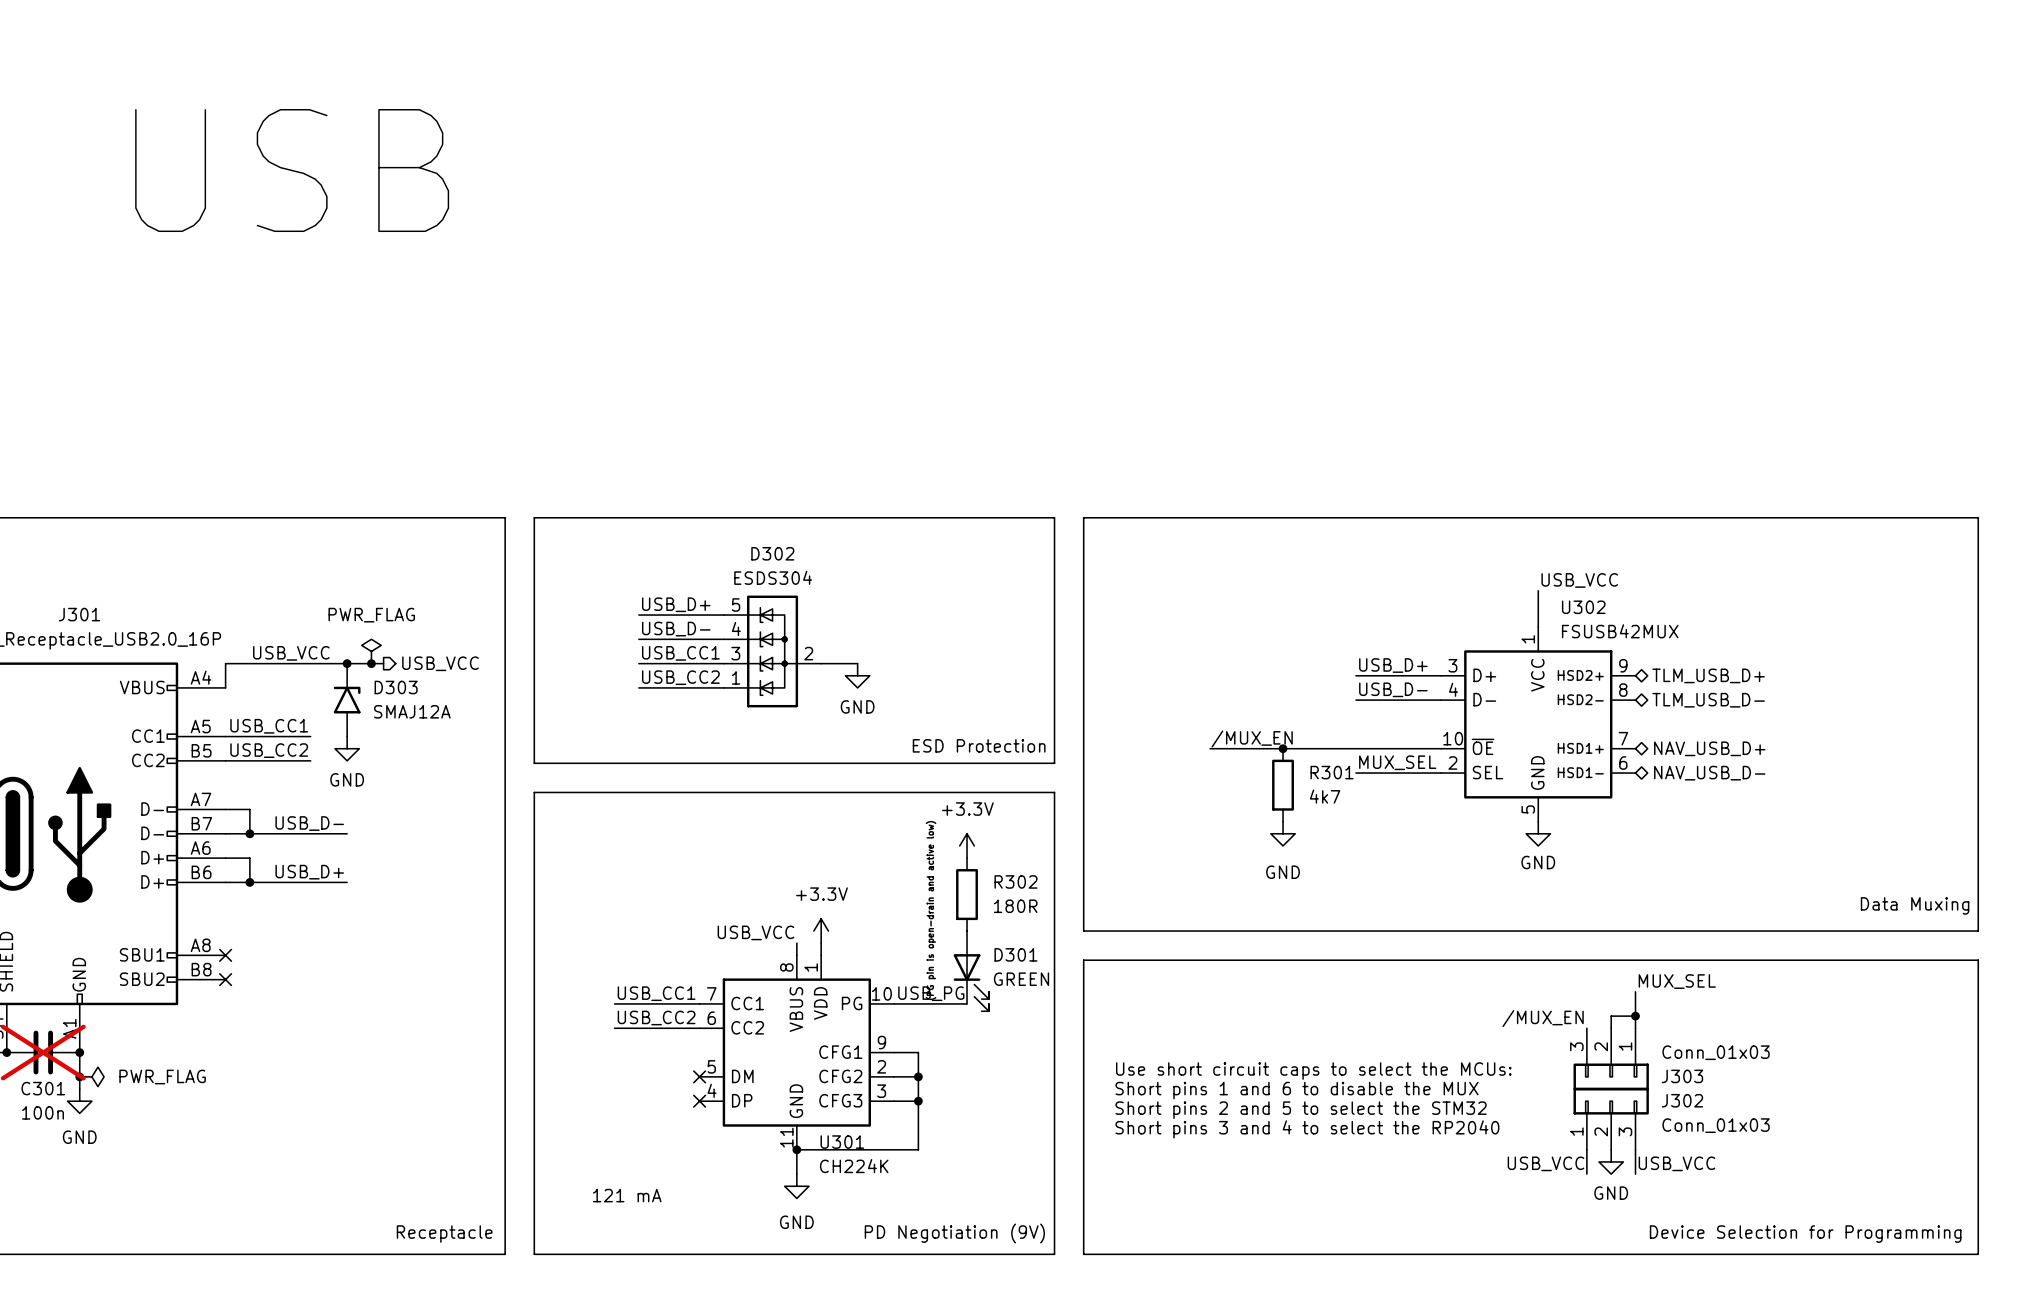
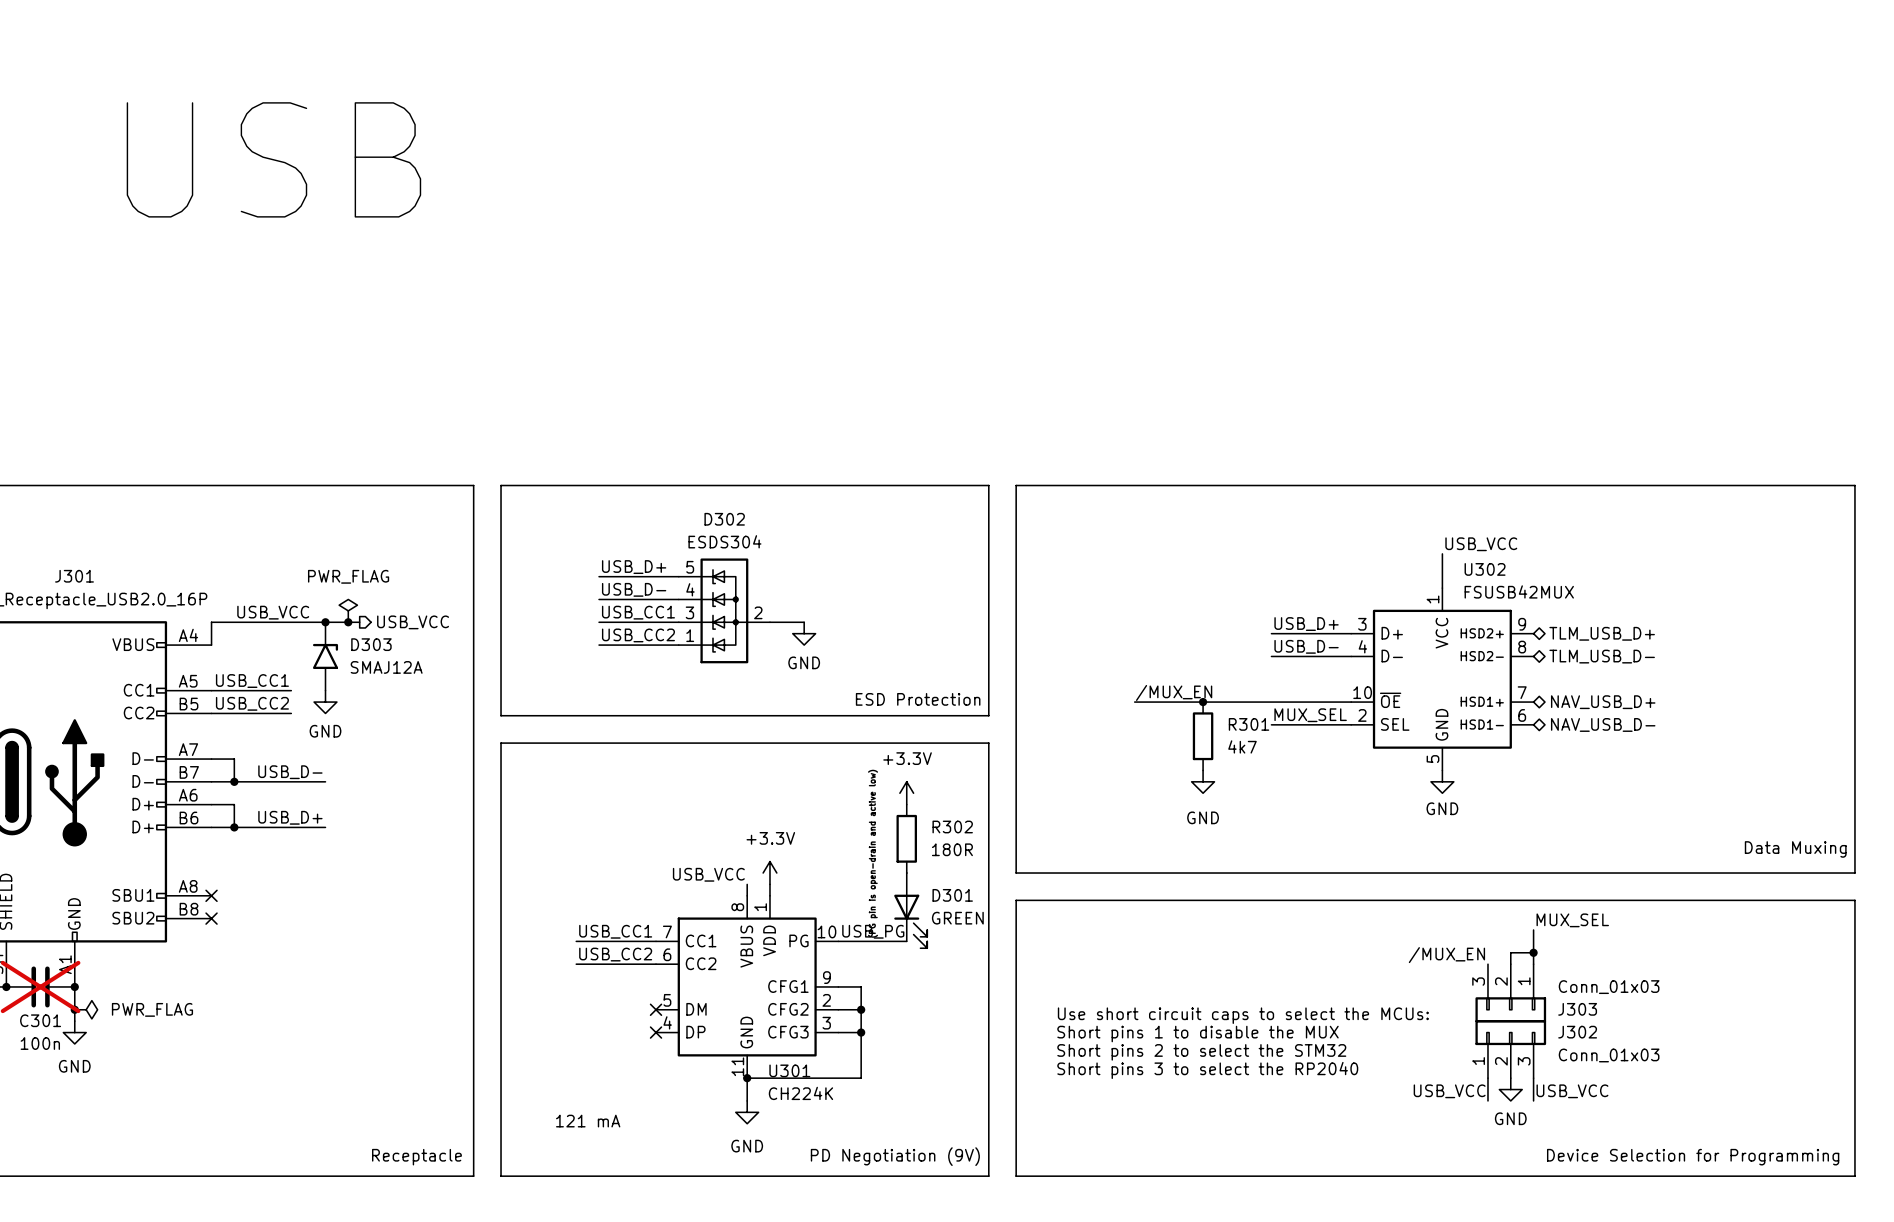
text position: Use short circuit caps to select the MCUs: (1313, 1071) -> Use short circuit caps to select the MCUs: (1243, 1015)
text: Short pins 1 and 6 to disable the MUX (1297, 1090) -> none
text: none -> Short pins 1 to disable the MUX (1197, 1034)
text: Short pins 2 and 5 to select the STM32 (1301, 1110) -> none
text: none -> Short pins 2 to select the STM32 (1201, 1052)
text: Short pins 3 and 4 to select the RP2040 (1307, 1129) -> none
text: none -> Short pins 3 to select the RP2040 (1207, 1070)

